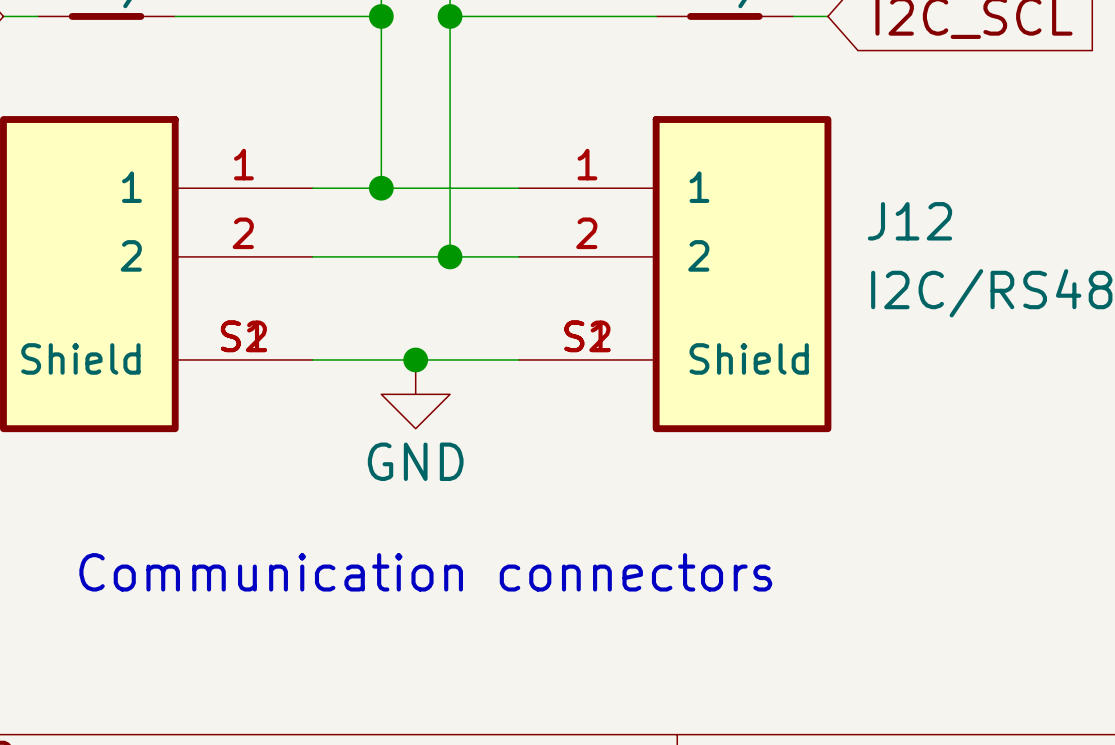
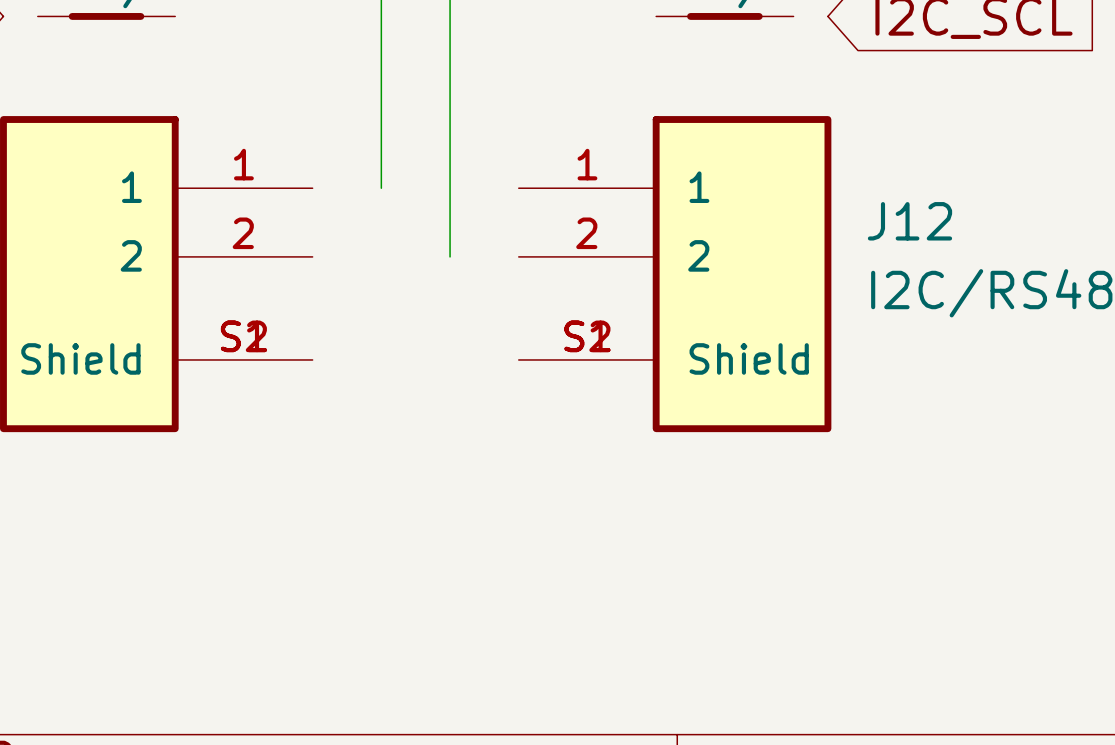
wire: (3, 16) (37, 16) -> none
wire: (175, 16) (381, 16) -> none
junction: (381, 16) -> none
wire: (450, 16) (656, 16) -> none
junction: (450, 16) -> none
wire: (793, 16) (827, 16) -> none
wire: (312, 188) (518, 188) -> none
junction: (381, 188) -> none
wire: (312, 256) (518, 256) -> none
junction: (450, 256) -> none
wire: (312, 359) (518, 359) -> none
junction: (415, 359) -> none
power symbol: GND (415, 394) -> none
text: Communication connectors (425, 572) -> none

